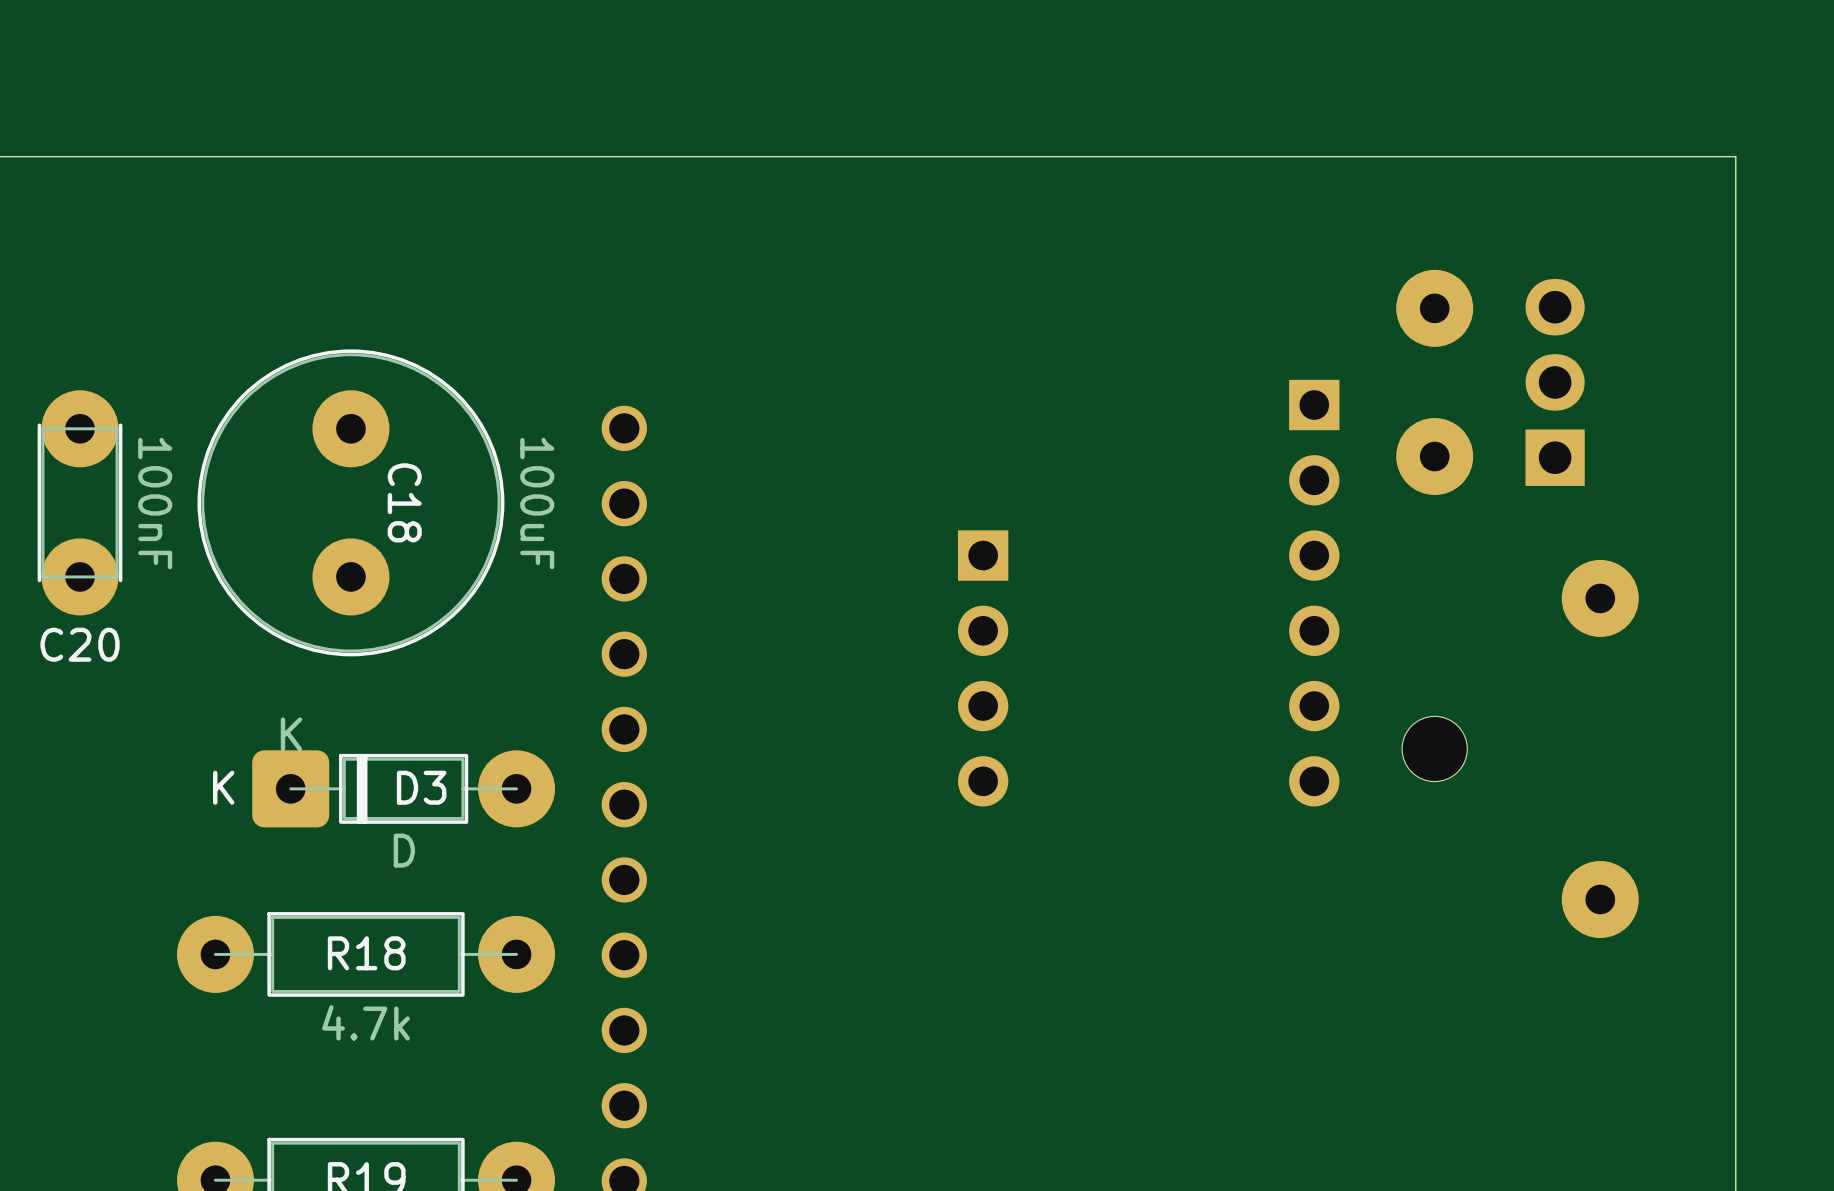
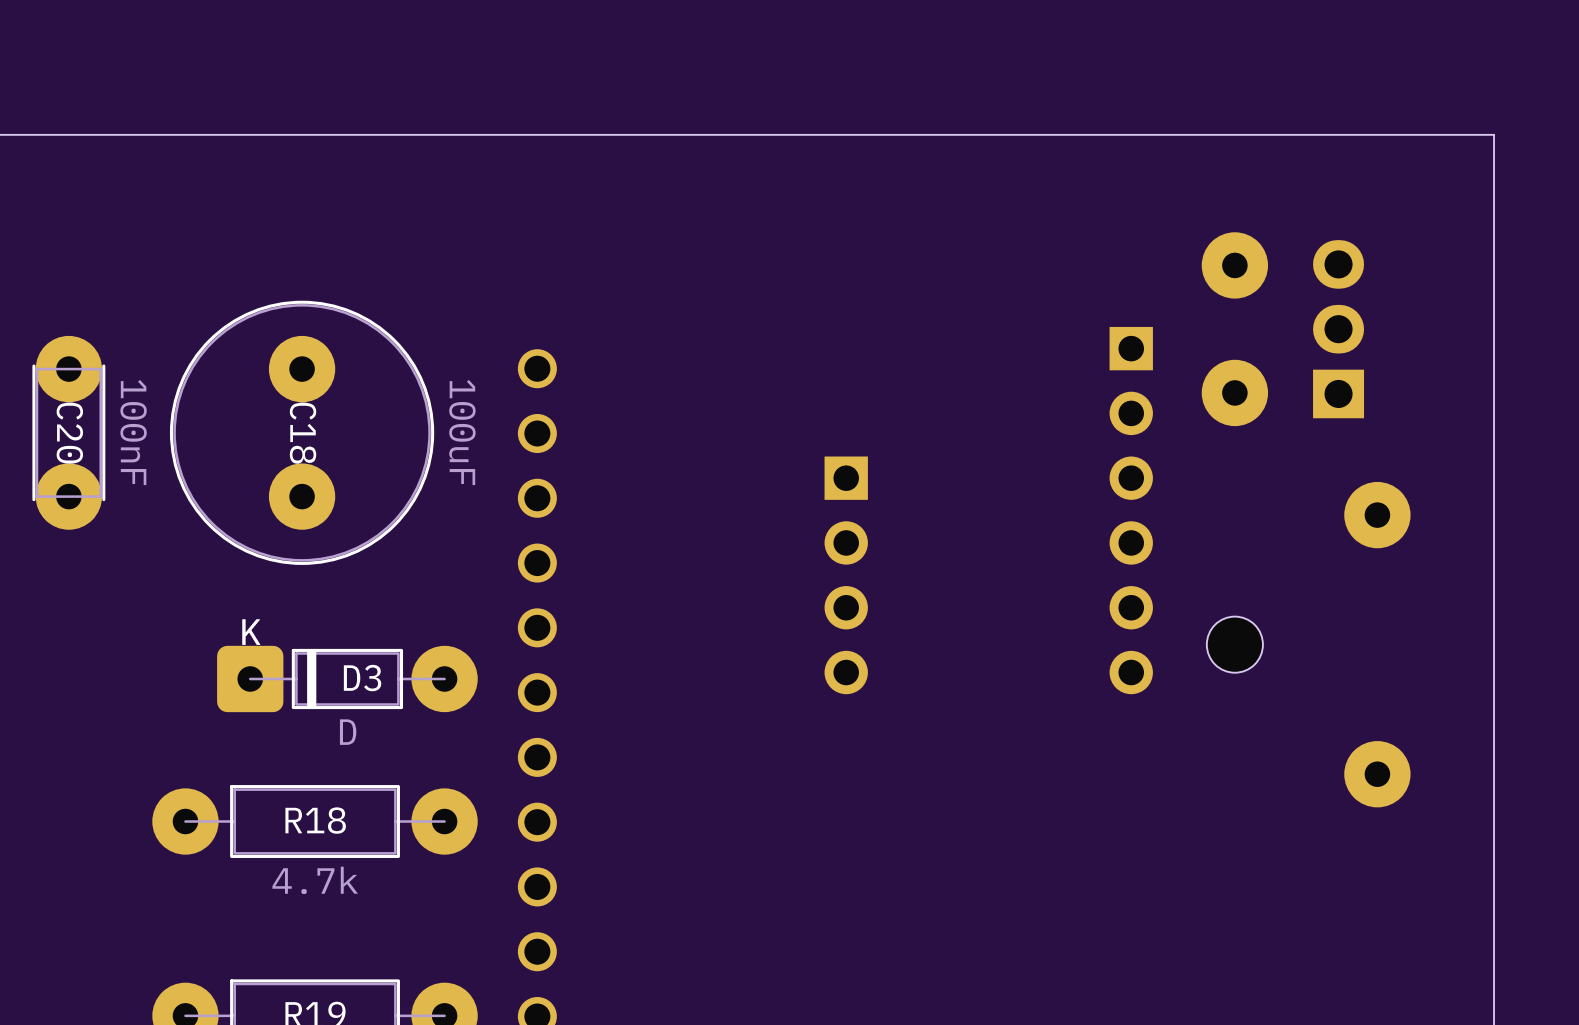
C18 name position: C18 (404, 502) -> C18 (303, 433)
C20 name rotation: 0° (80, 644) -> 90° clockwise (69, 433)
C20 name position: C20 (80, 644) -> C20 (69, 433)
D3 footprint: [252, 750, 556, 828] -> [217, 645, 478, 713]

